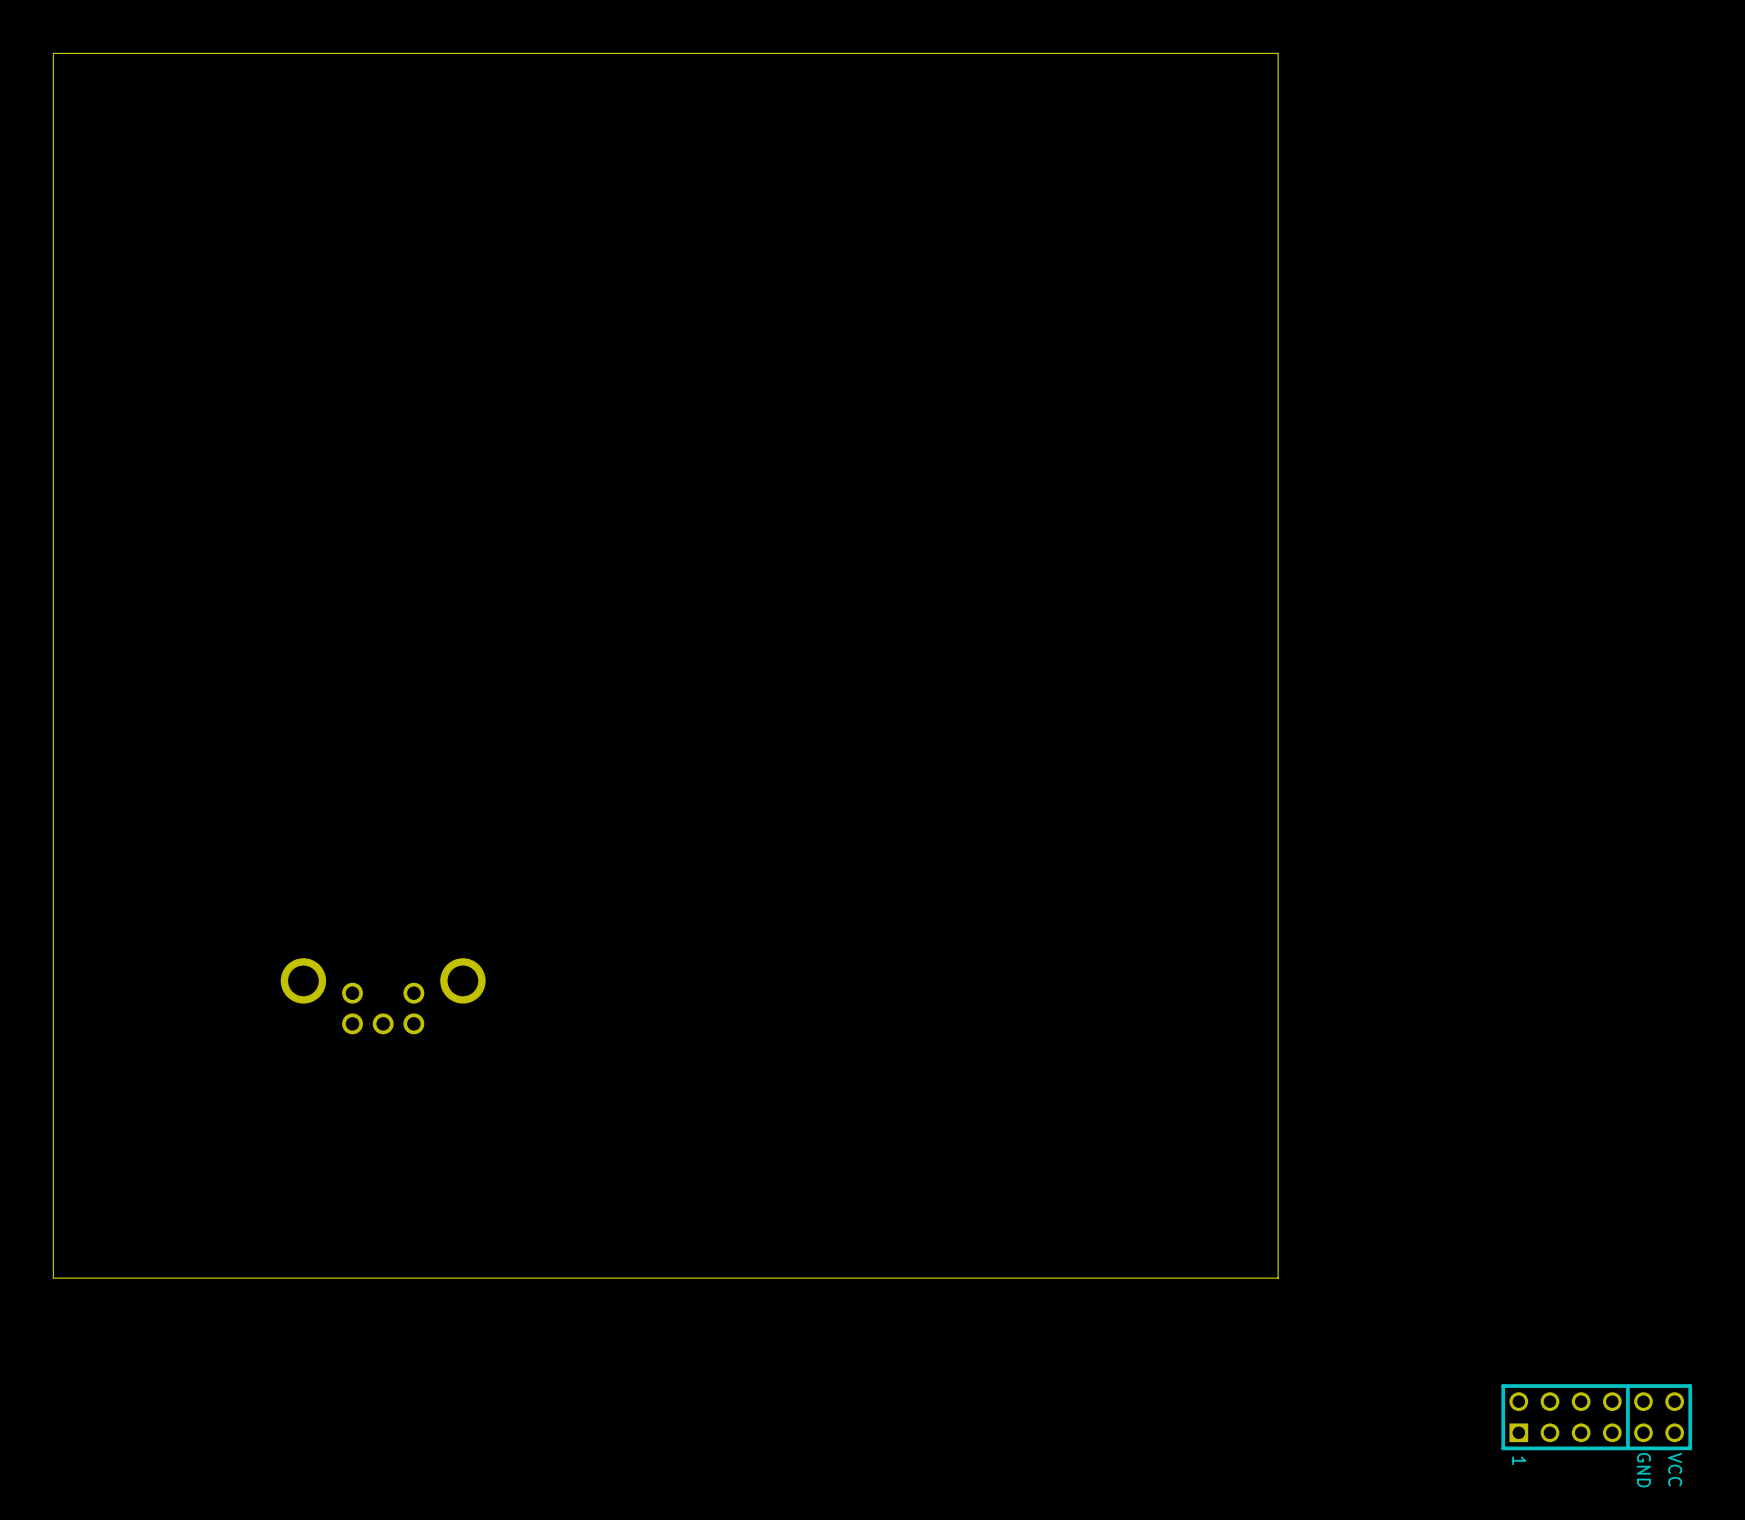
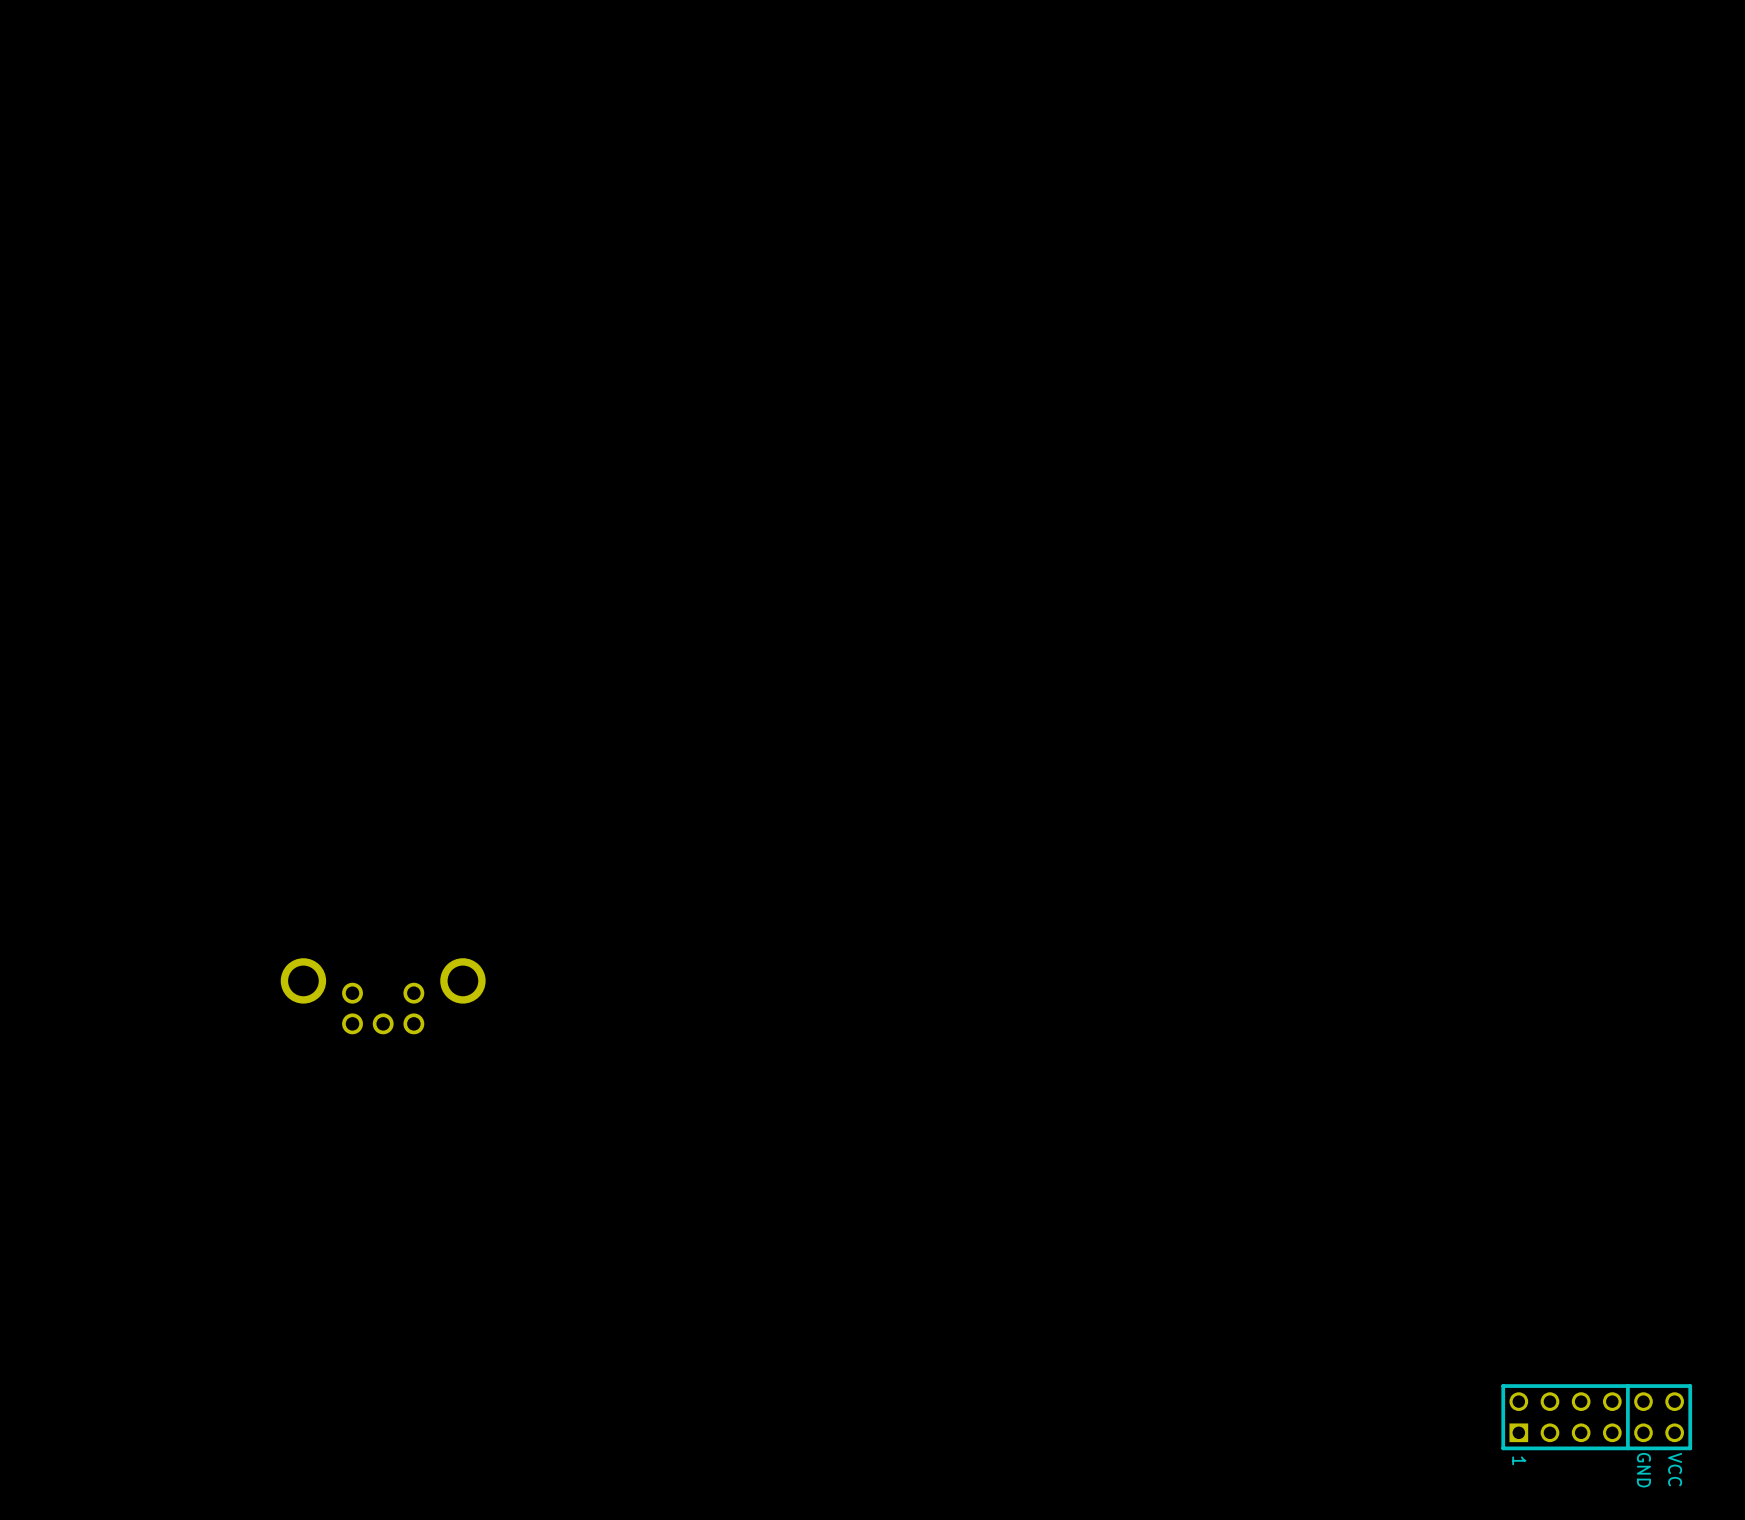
board edge: (1278, 53) (1278, 1278) (53, 1278) (53, 53) (1278, 53) -> none

